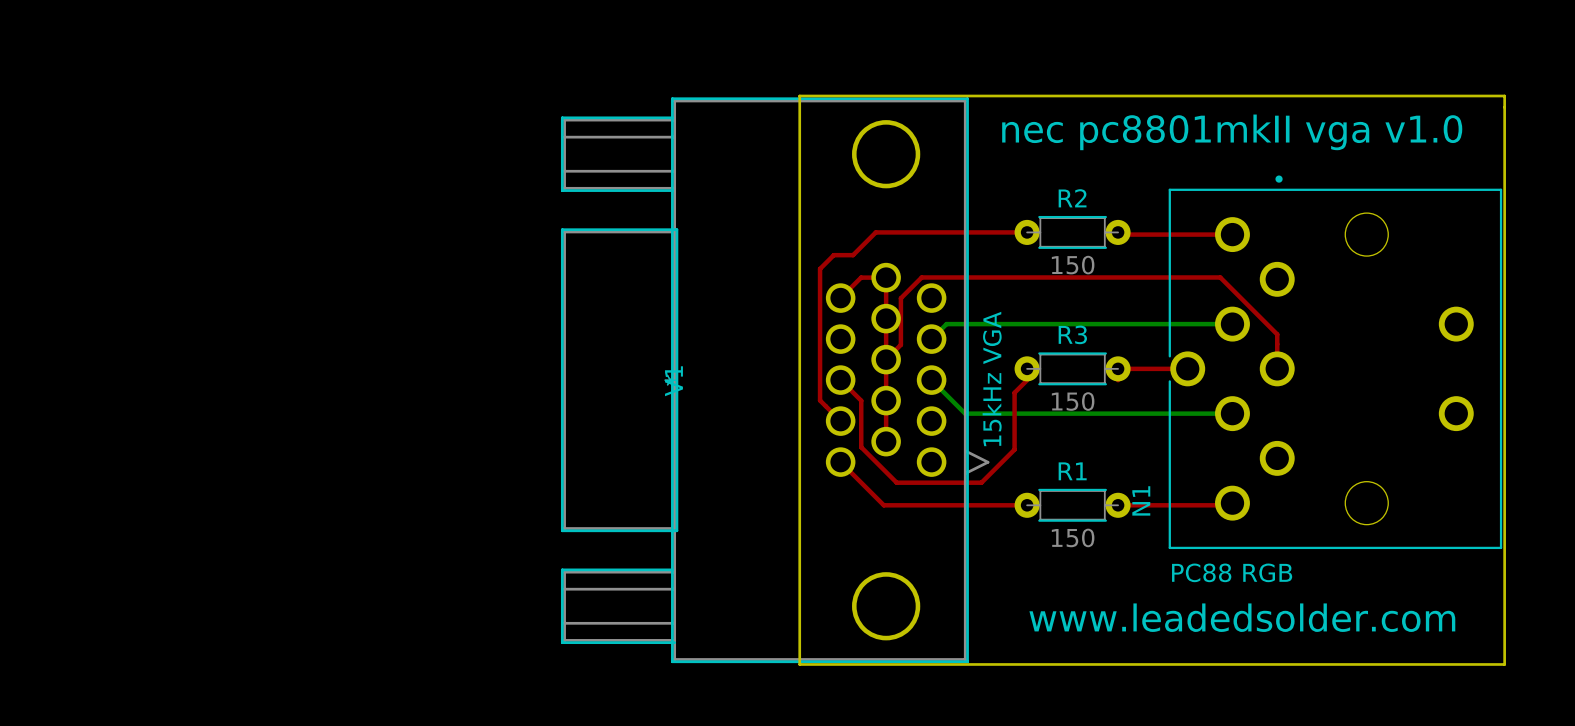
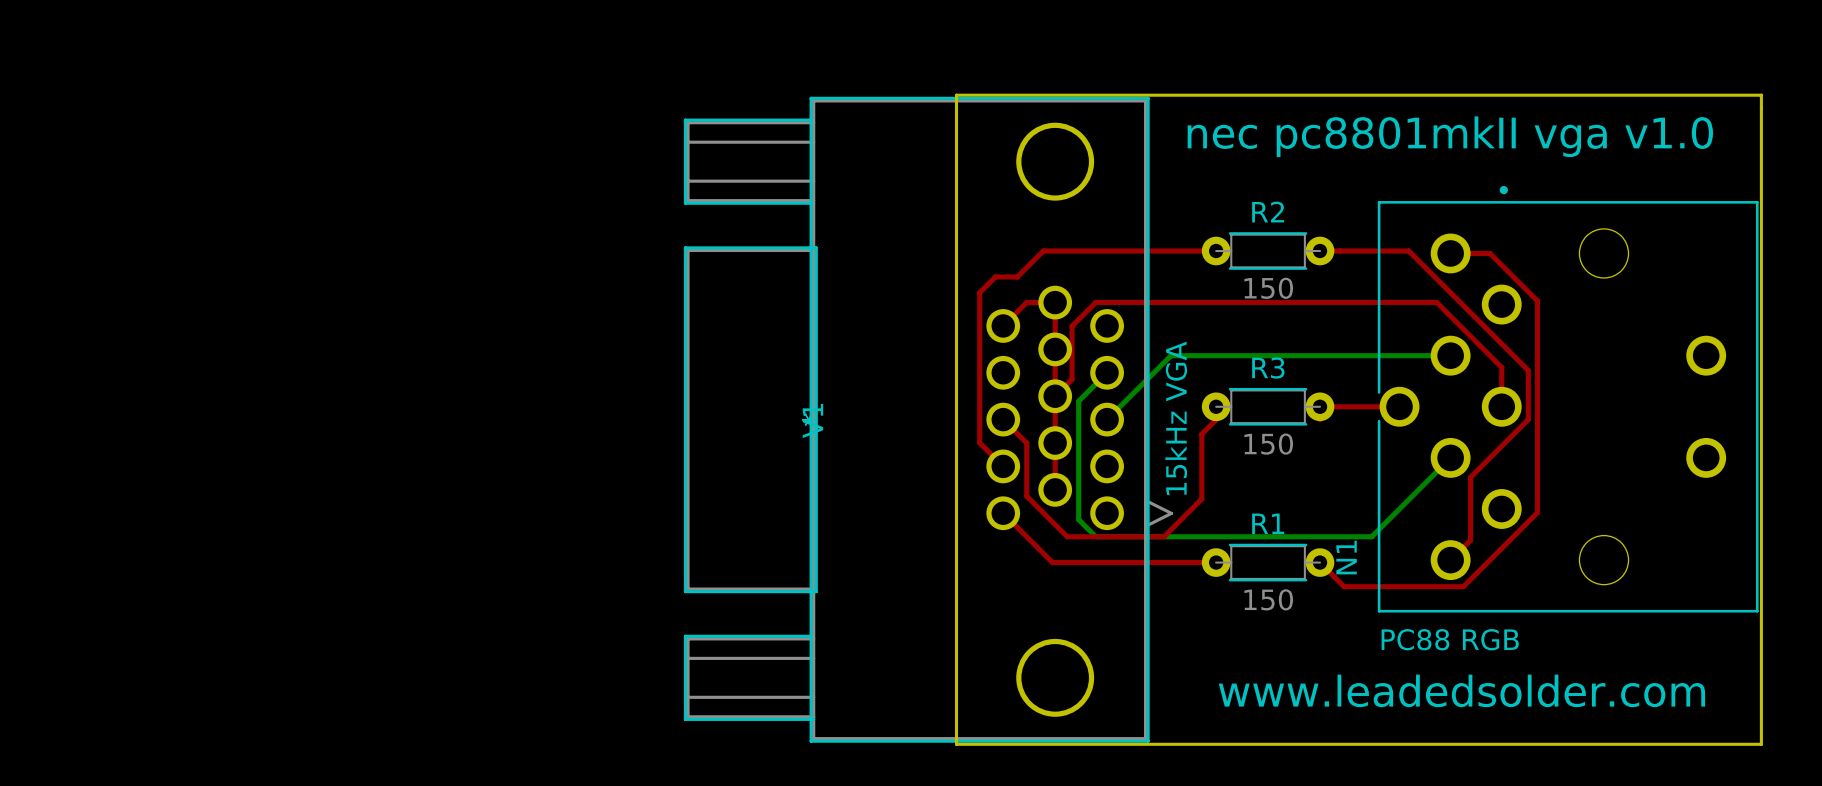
top track: none -> (1320, 251) (1408, 251) (1528, 370) (1528, 419) (1470, 477) (1470, 540) (1450, 560)
top track: (1120, 234) (1232, 234) -> (1320, 562) (1344, 586) (1463, 586) (1537, 512) (1537, 301) (1489, 253) (1450, 253)
bottom track: (987, 324) (946, 324) (931, 339) -> (1171, 355) (1107, 419)
bottom track: (931, 380) (965, 413) (1232, 413) -> (1107, 372) (1078, 401) (1078, 519) (1095, 536) (1371, 536) (1450, 457)
top track: (1118, 505) (1230, 505) -> none

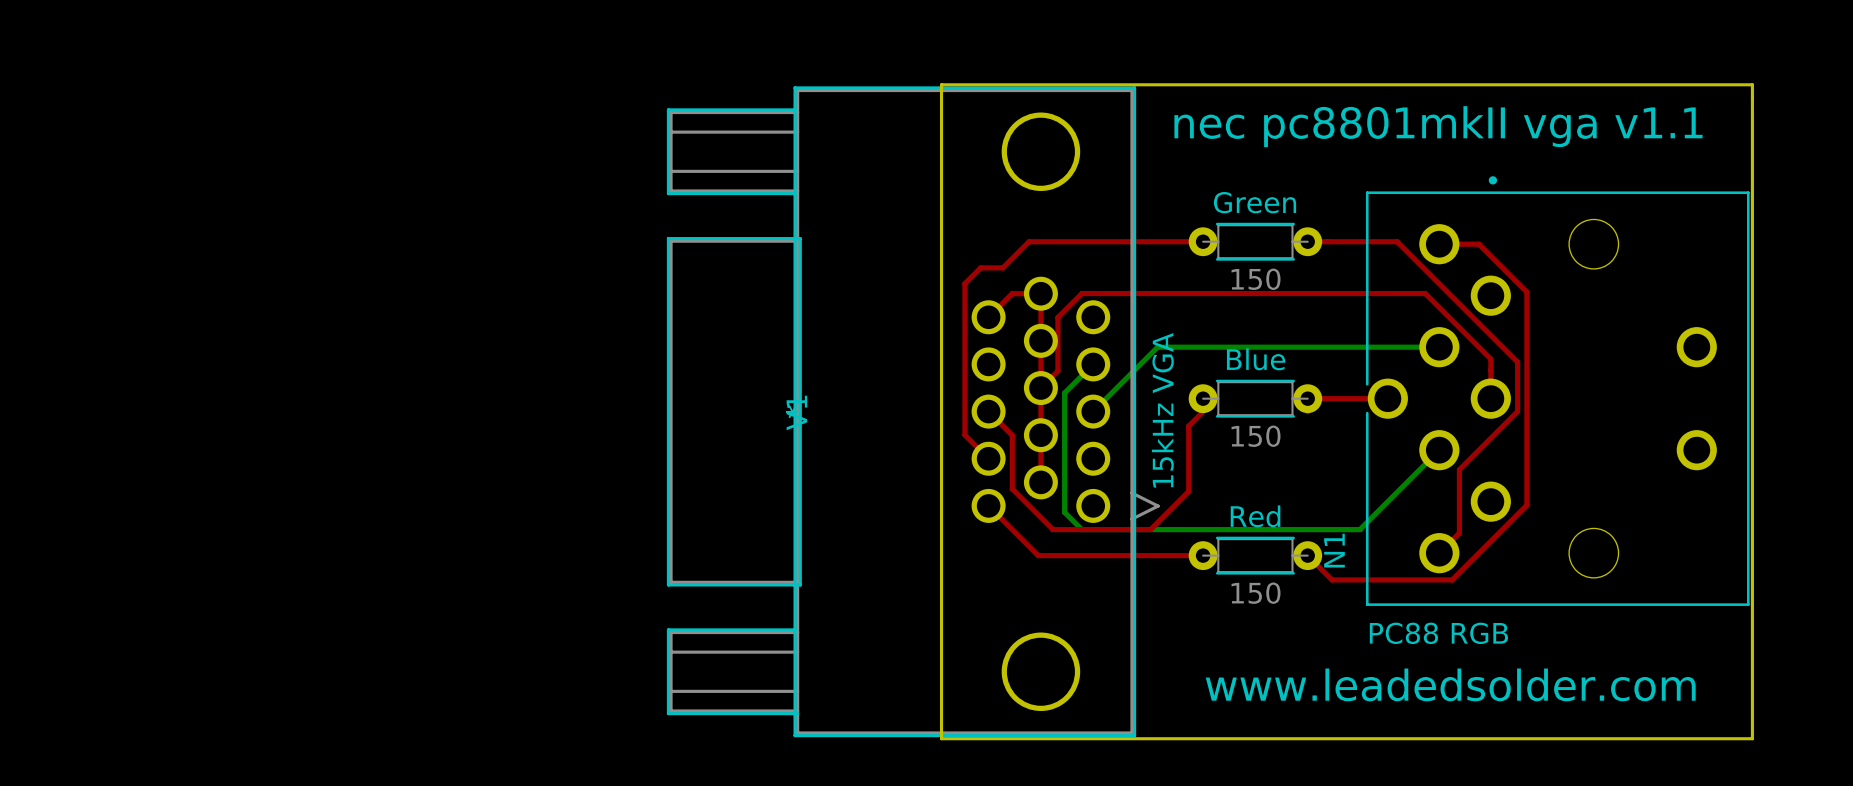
text: nec pc8801mkII vga v1.0 (1450, 136) -> nec pc8801mkII vga v1.1 (1438, 126)
R2 name: R2 (1268, 212) -> Green (1255, 202)
R3 name: R3 (1268, 368) -> Blue (1256, 359)
R1 name: R1 (1268, 523) -> Red (1255, 516)

